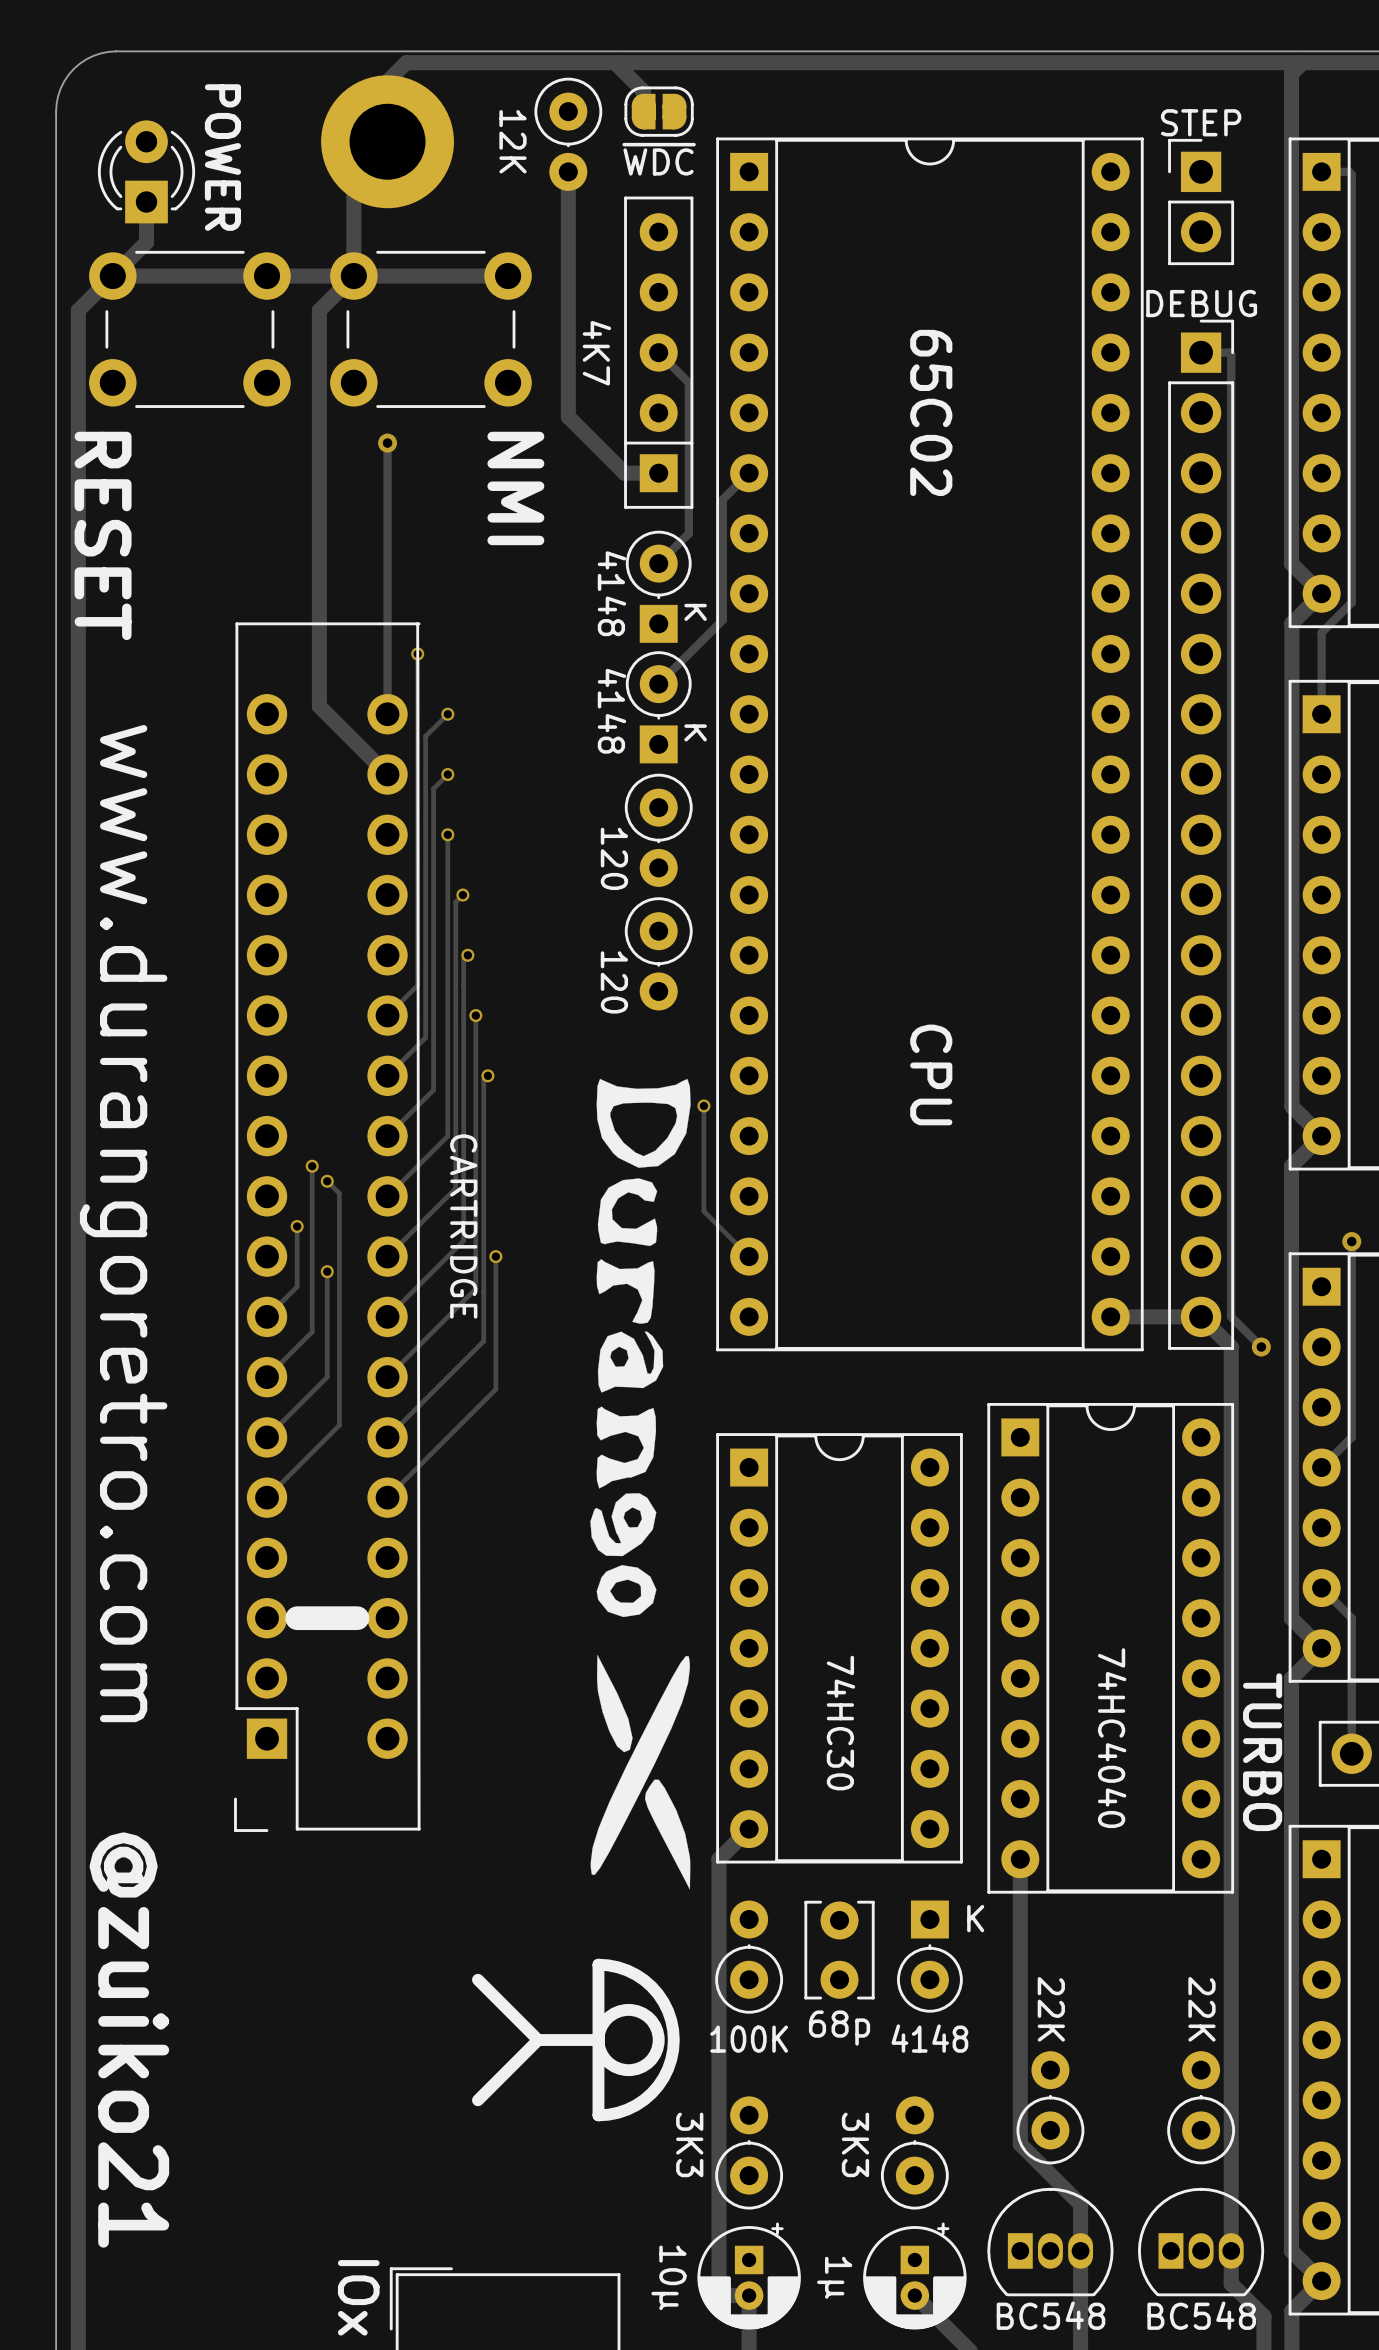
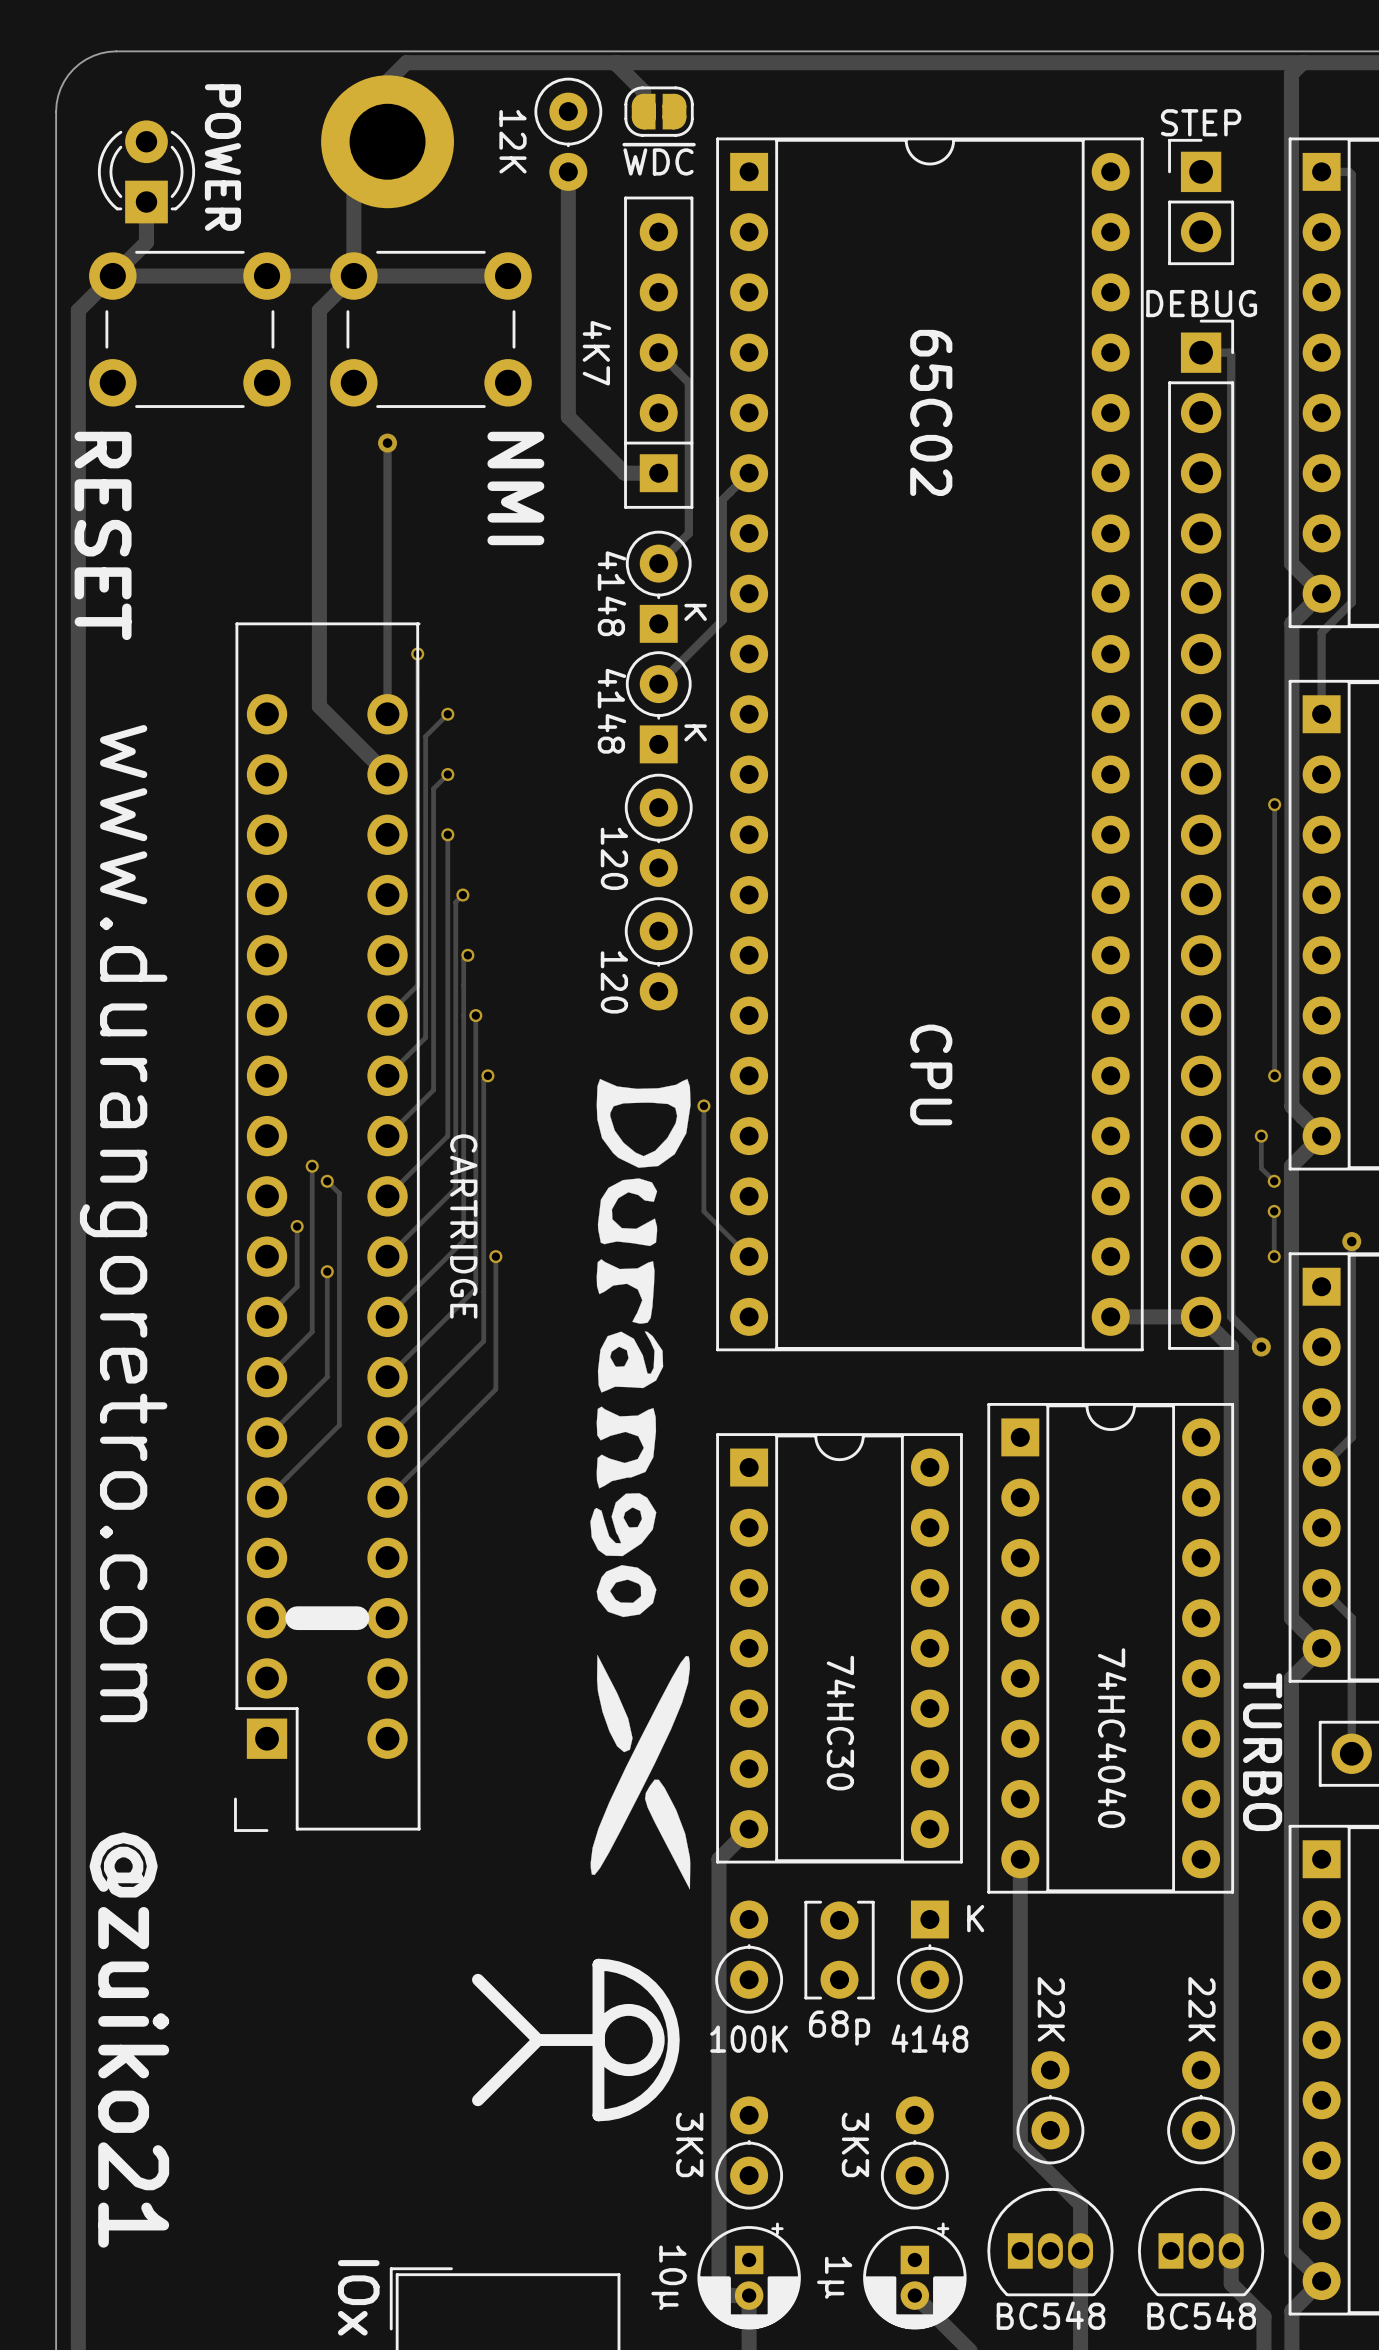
track: none -> (1274, 804) (1274, 1075)
via: none -> (1274, 804)
via: none -> (1274, 1075)
track: none -> (1261, 1136) (1261, 1168) (1274, 1181)
via: none -> (1261, 1136)
via: none -> (1274, 1181)
track: none -> (1274, 1211) (1274, 1256)
via: none -> (1274, 1211)
via: none -> (1274, 1256)

